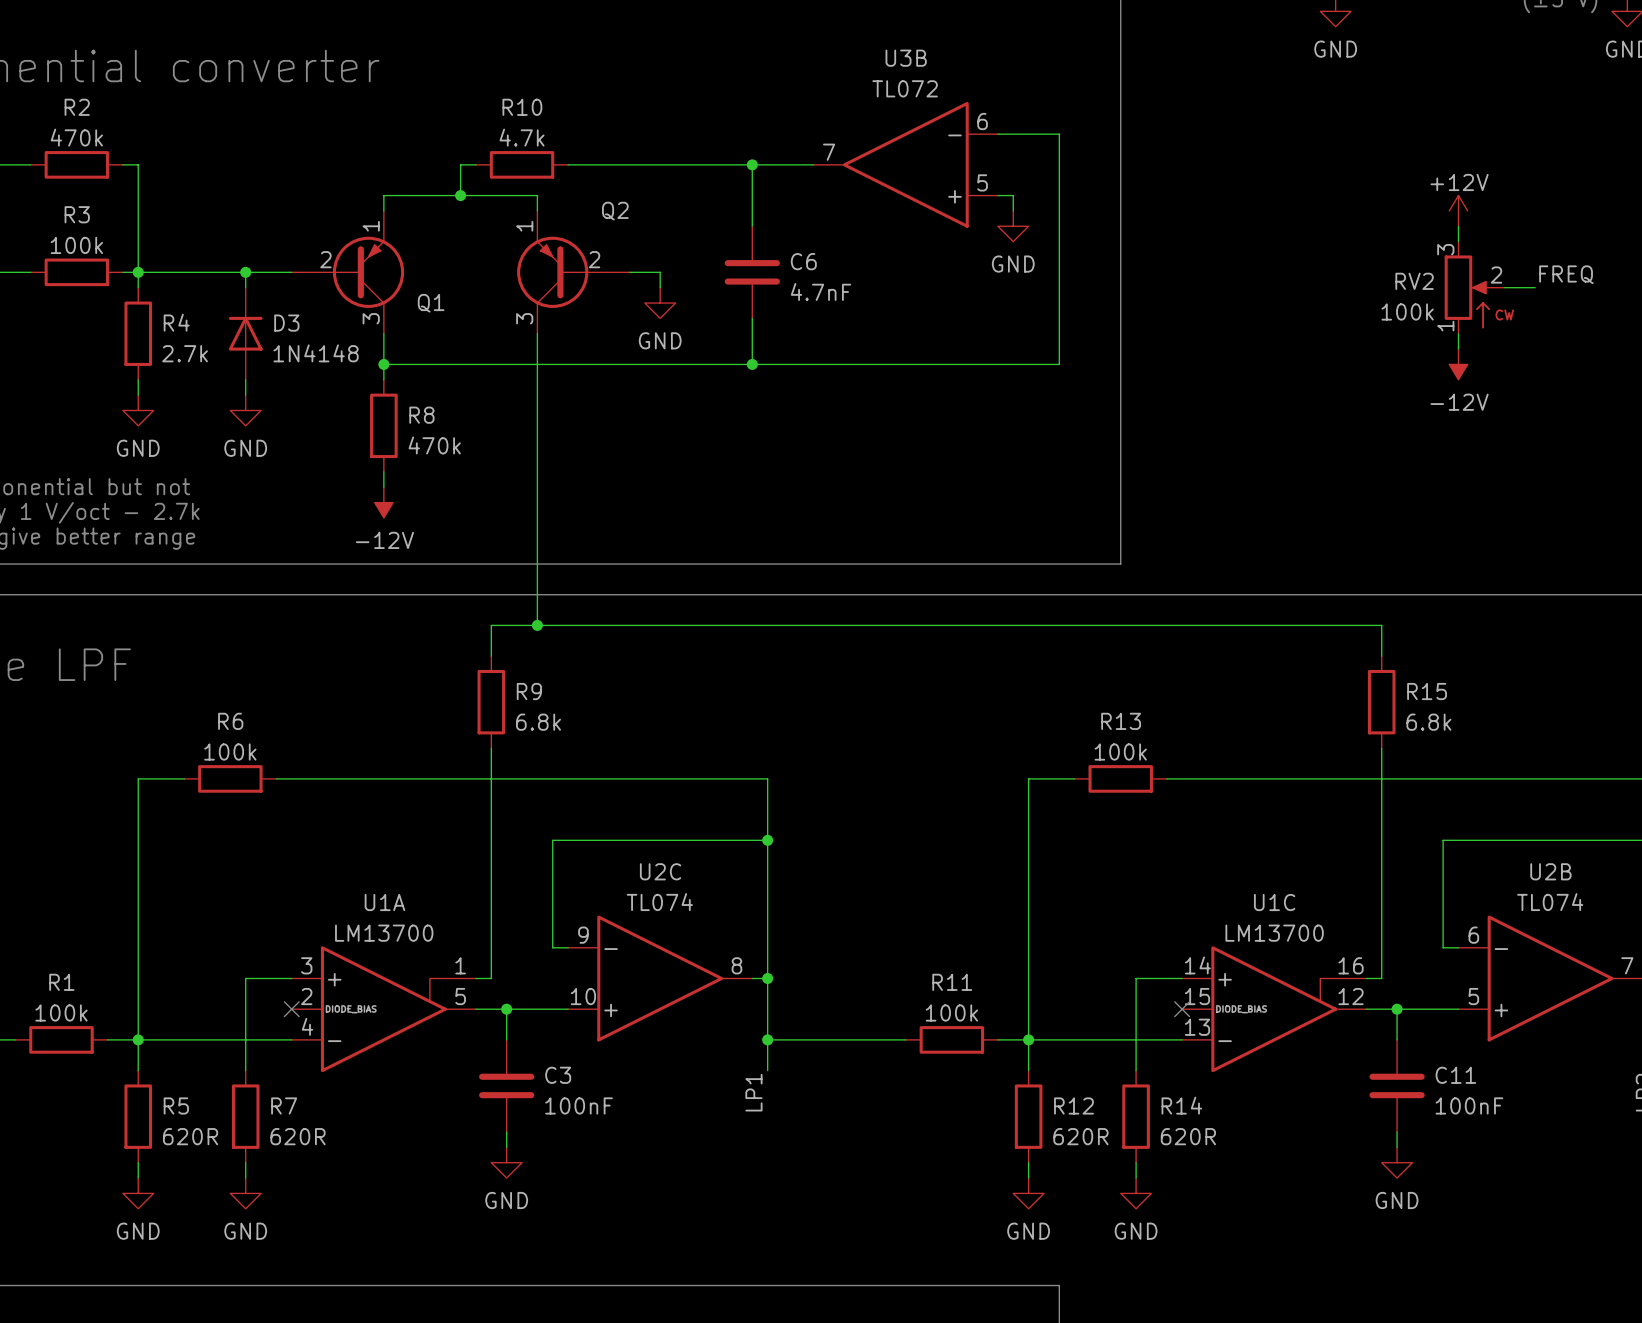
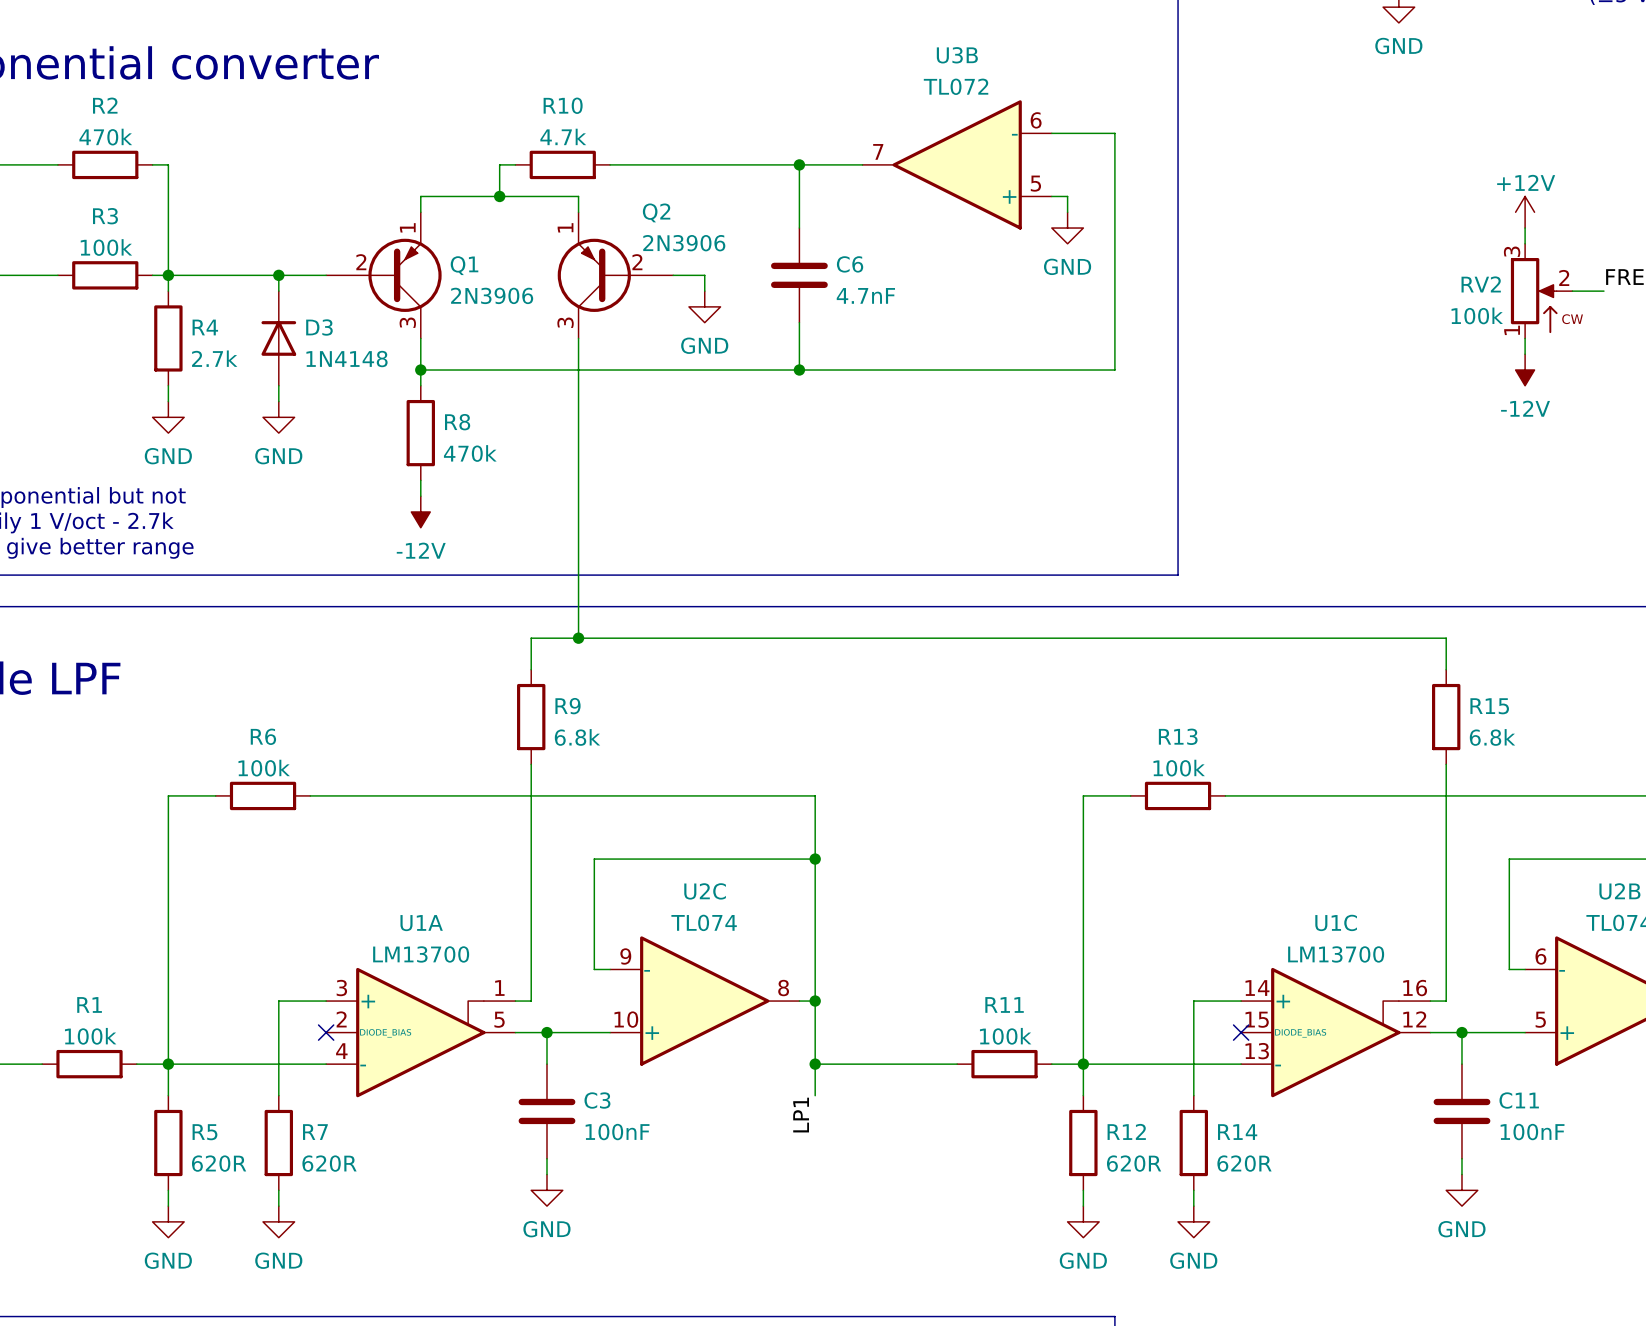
Q2 value: none -> 2N3906 (684, 243)
Q1 value: none -> 2N3906 (492, 295)
Q1 name position: Q1 (431, 303) -> Q1 (464, 265)

